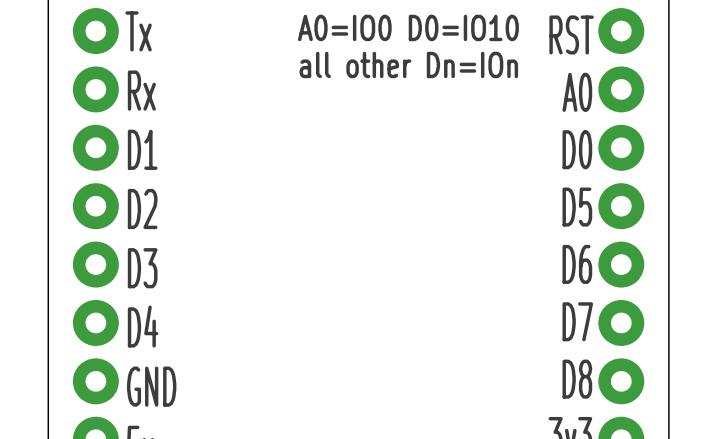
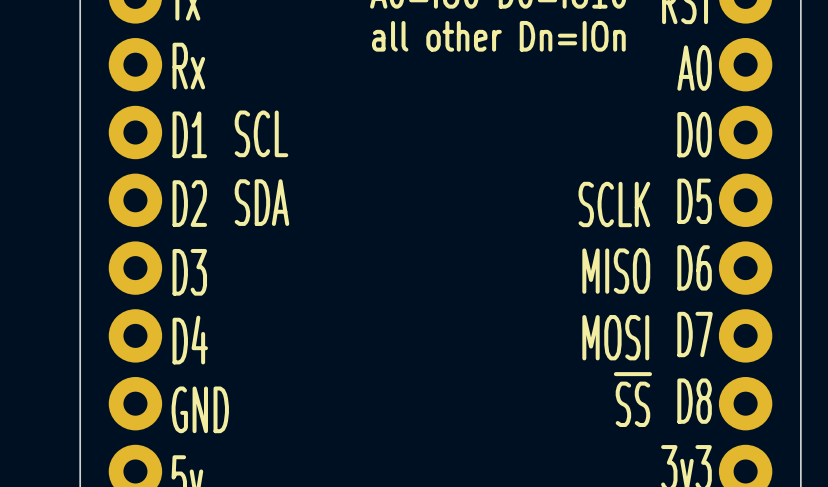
text: none -> SCL (261, 133)
text: none -> SDA (261, 202)
text: none -> SCLK (614, 204)
text: none -> MISO (616, 271)
text: none -> MOSI (615, 337)
text: none -> ~{SS} (632, 399)

